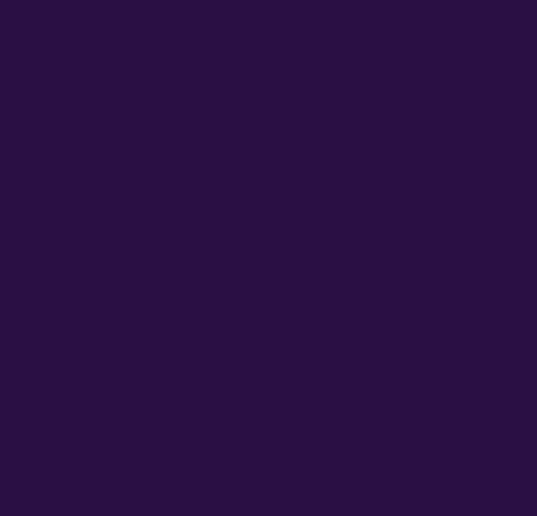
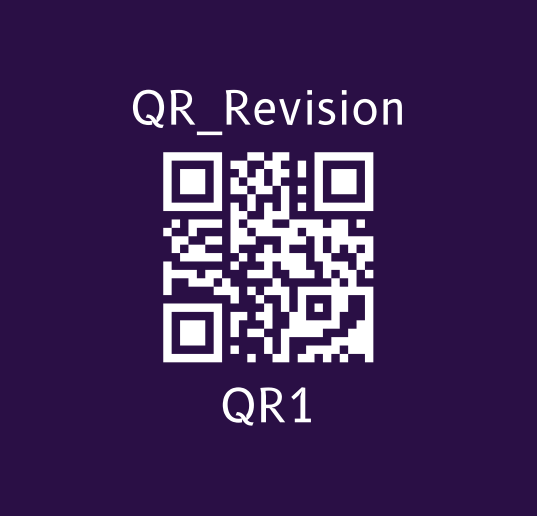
QR1: none -> QR_Revision (268, 257)

